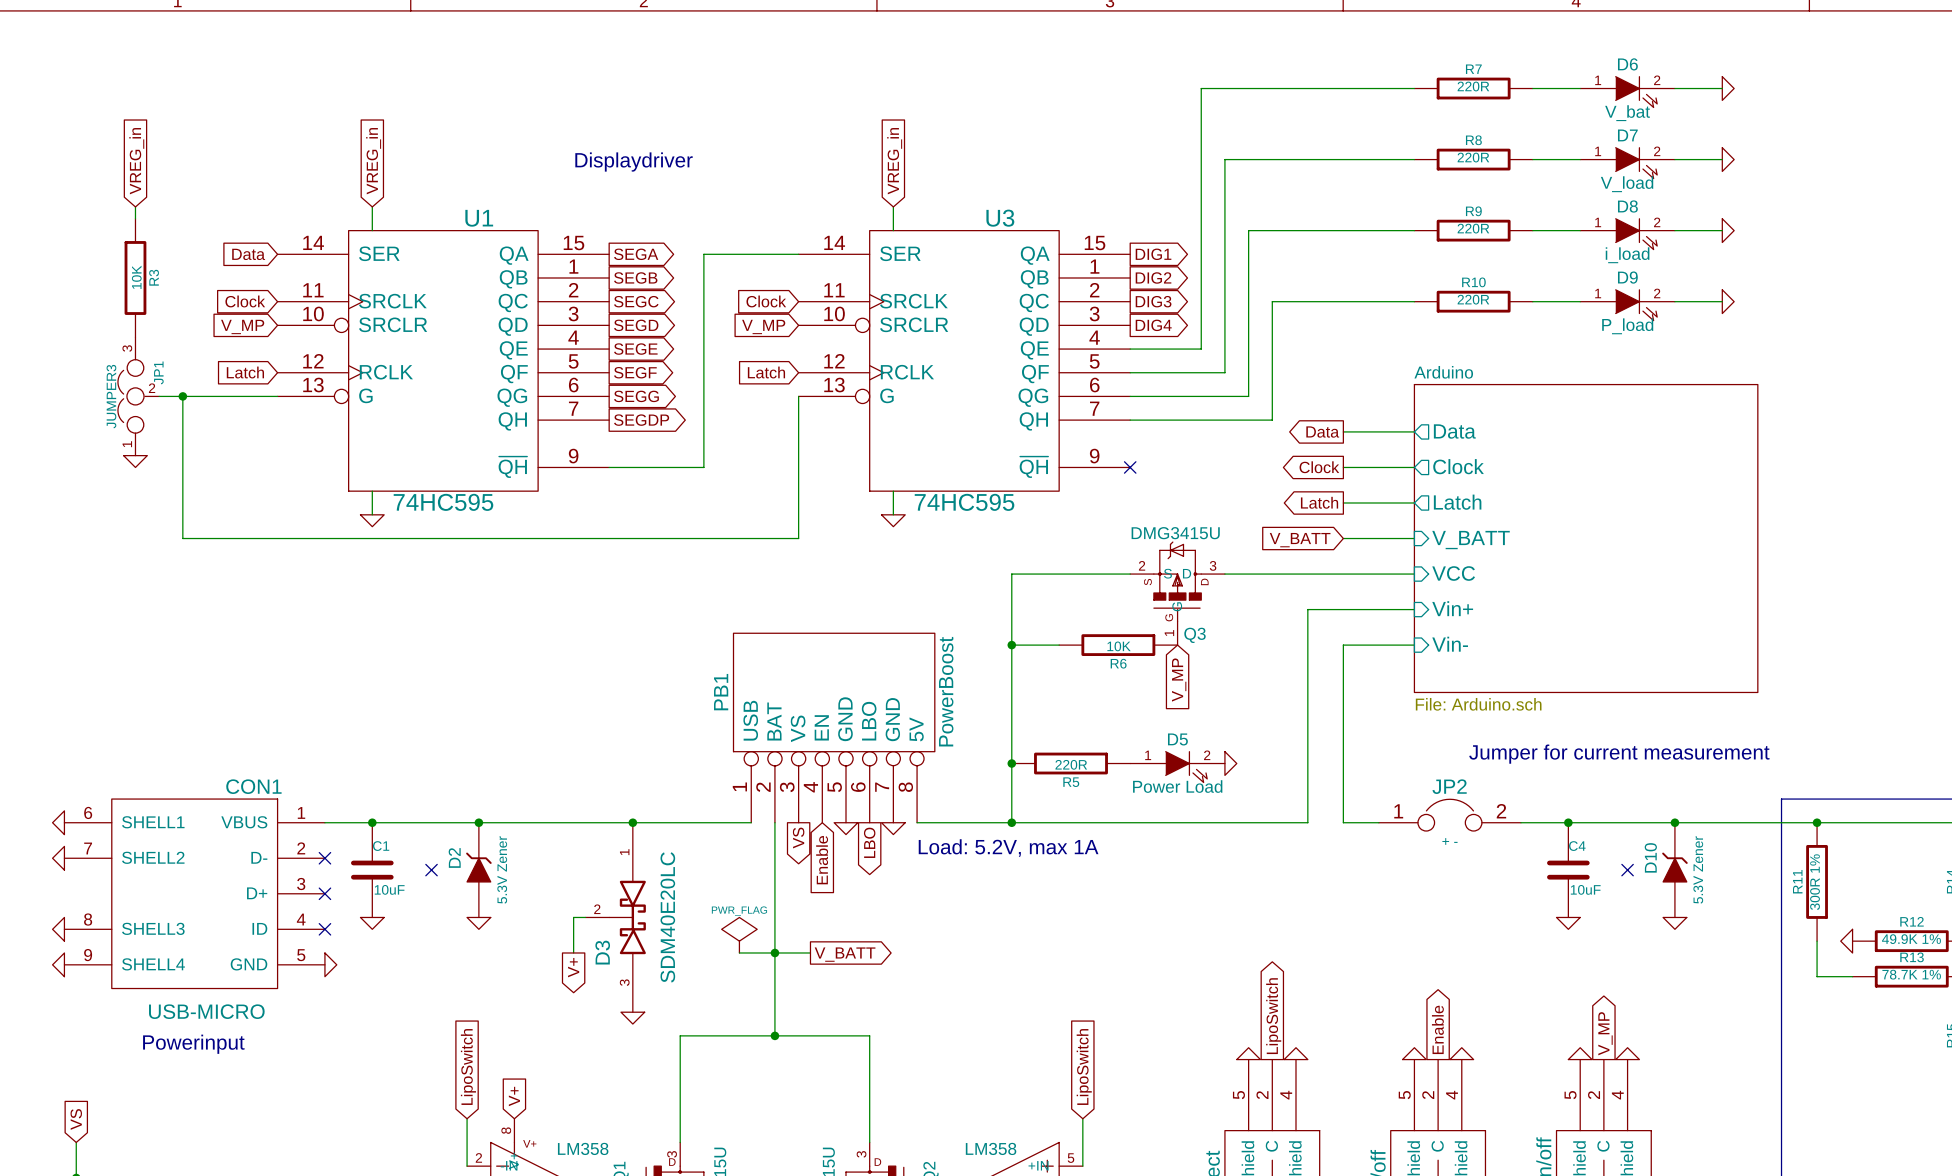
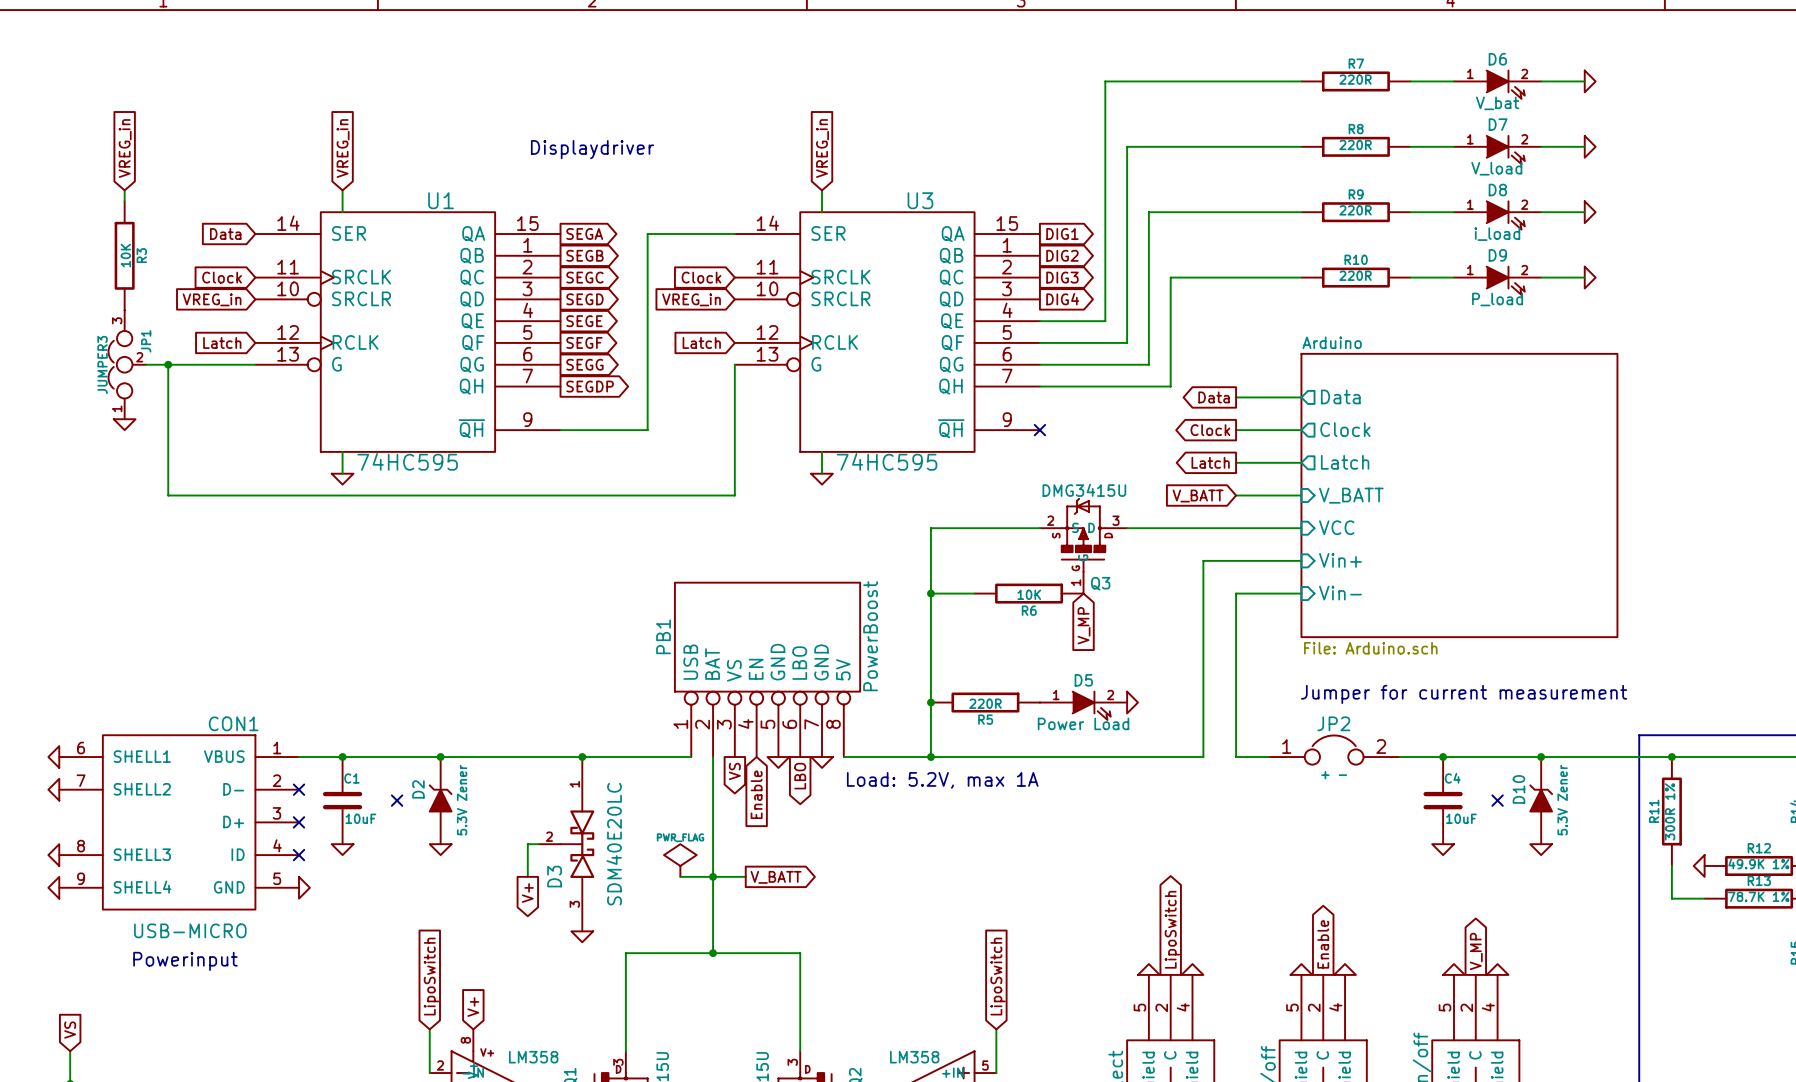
global label: V_MP (242, 326) -> VREG_in (212, 299)
global label: V_MP (763, 326) -> VREG_in (691, 299)

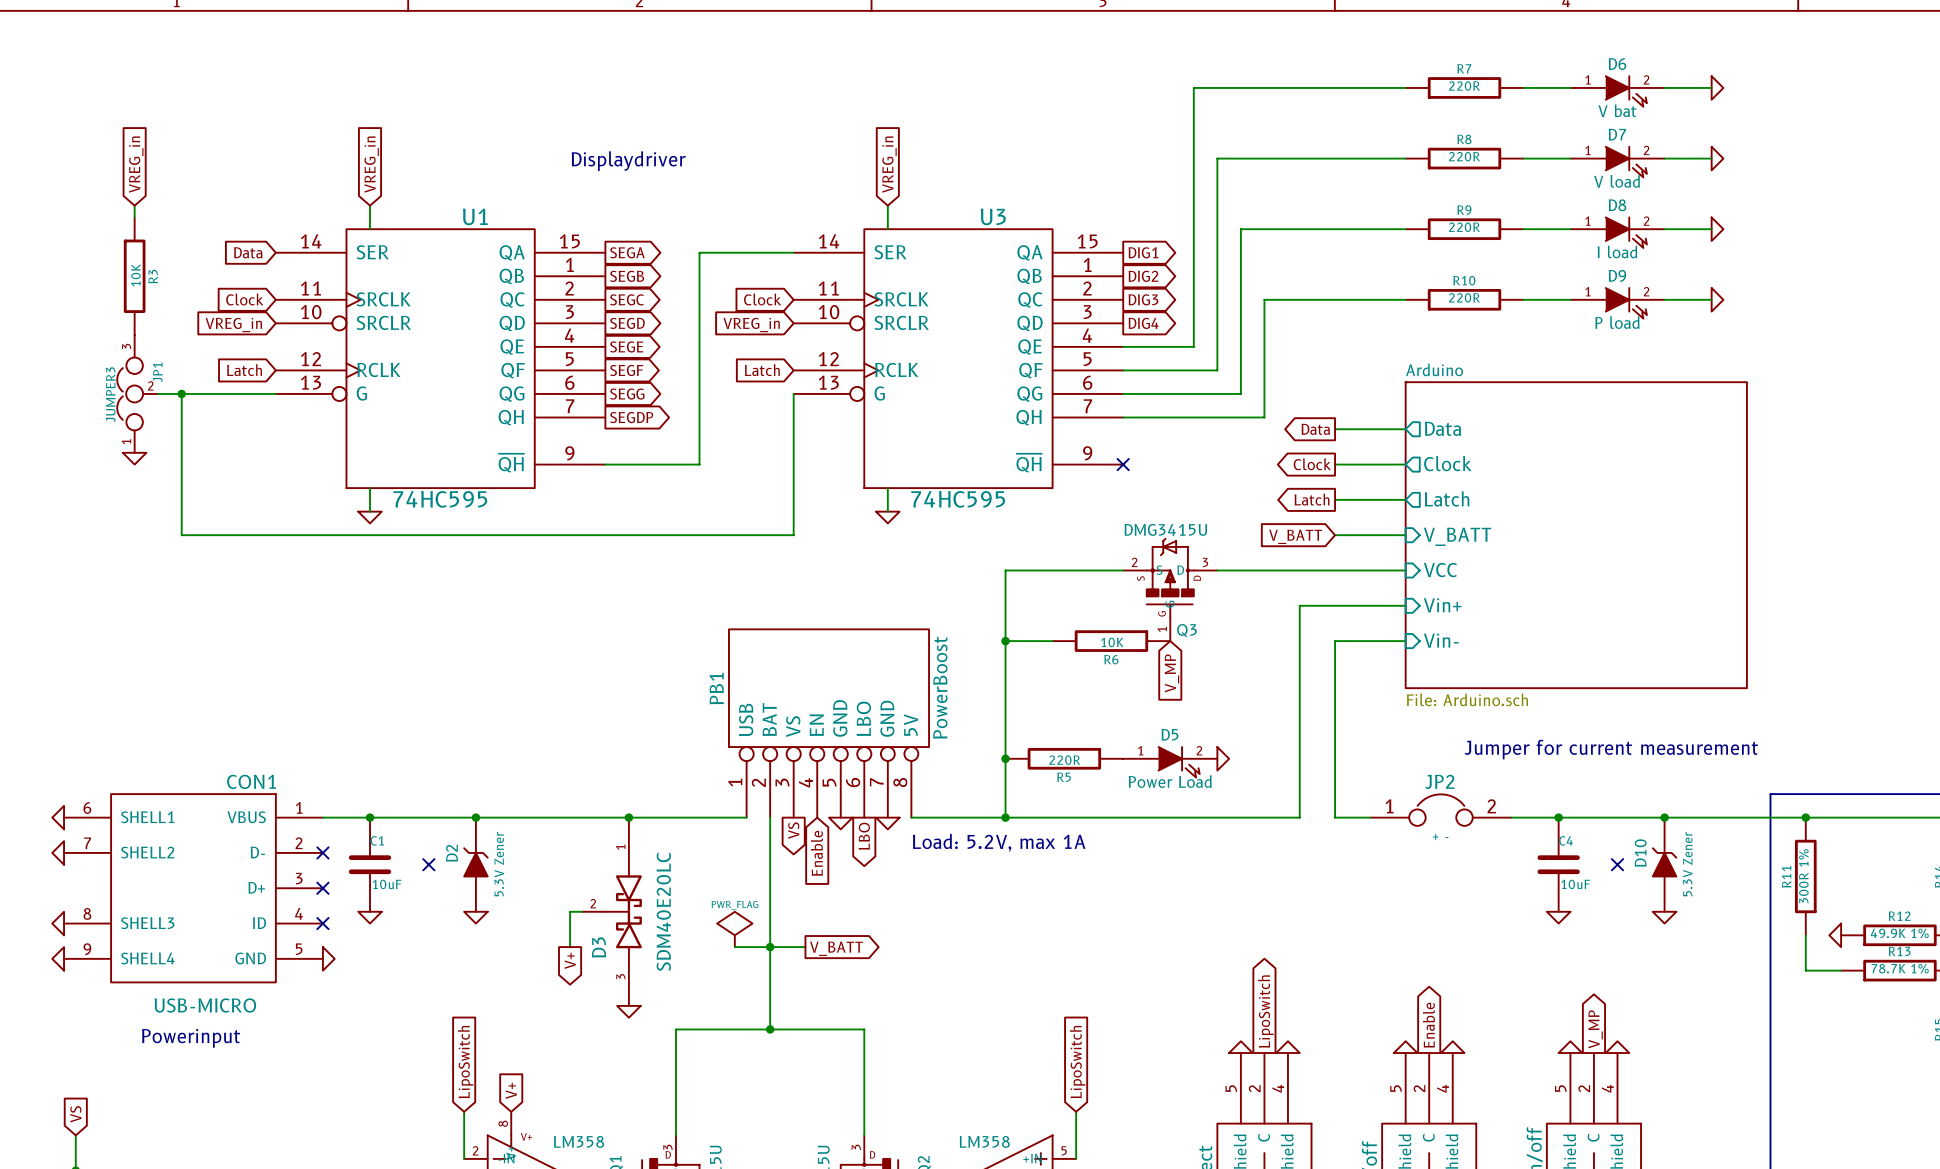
D6 value: V_bat (1497, 103) -> V bat (1617, 110)
D7 value: V_load (1496, 168) -> V load (1617, 181)
D8 value: i_load (1497, 234) -> I load (1617, 251)
D9 value: P_load (1497, 299) -> P load (1617, 322)

